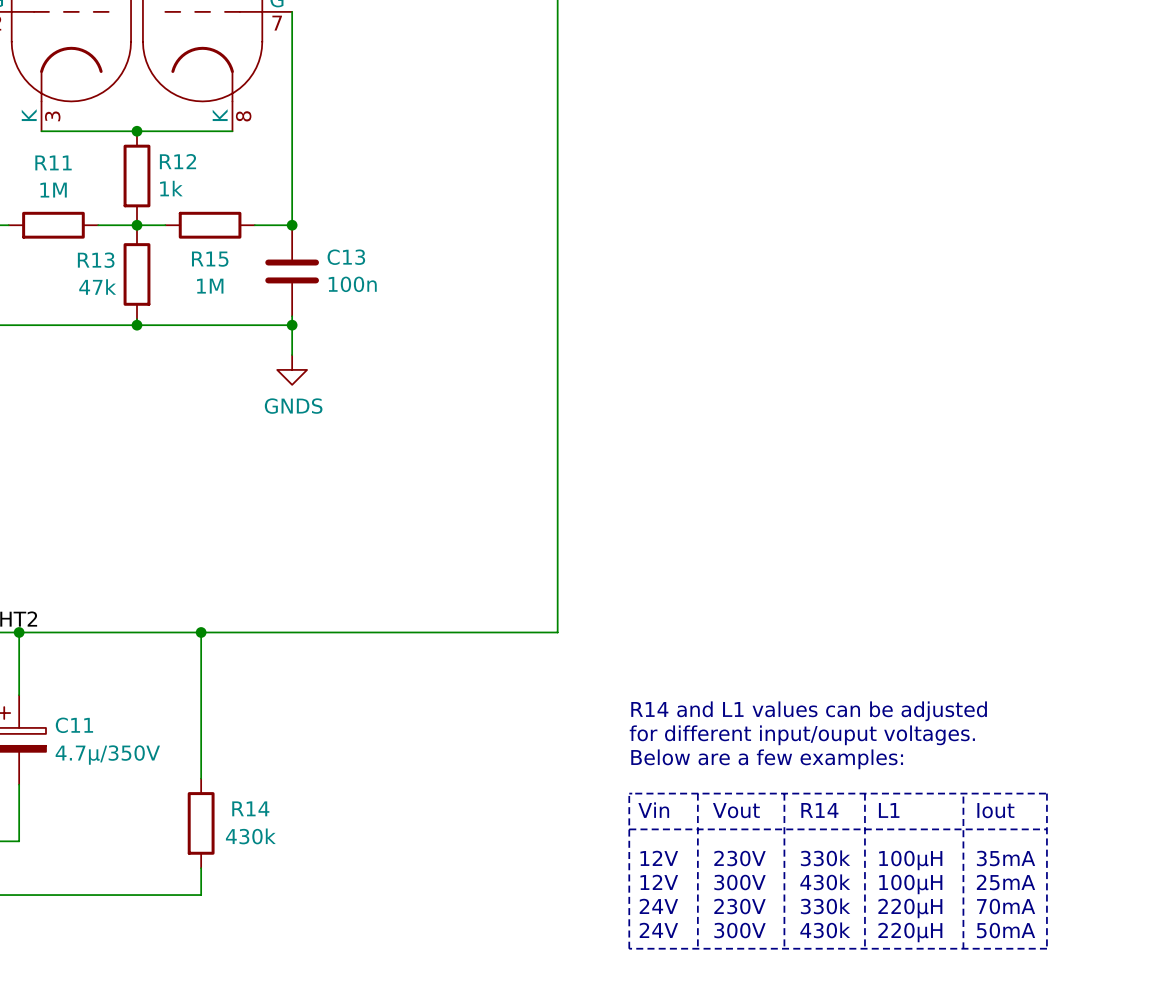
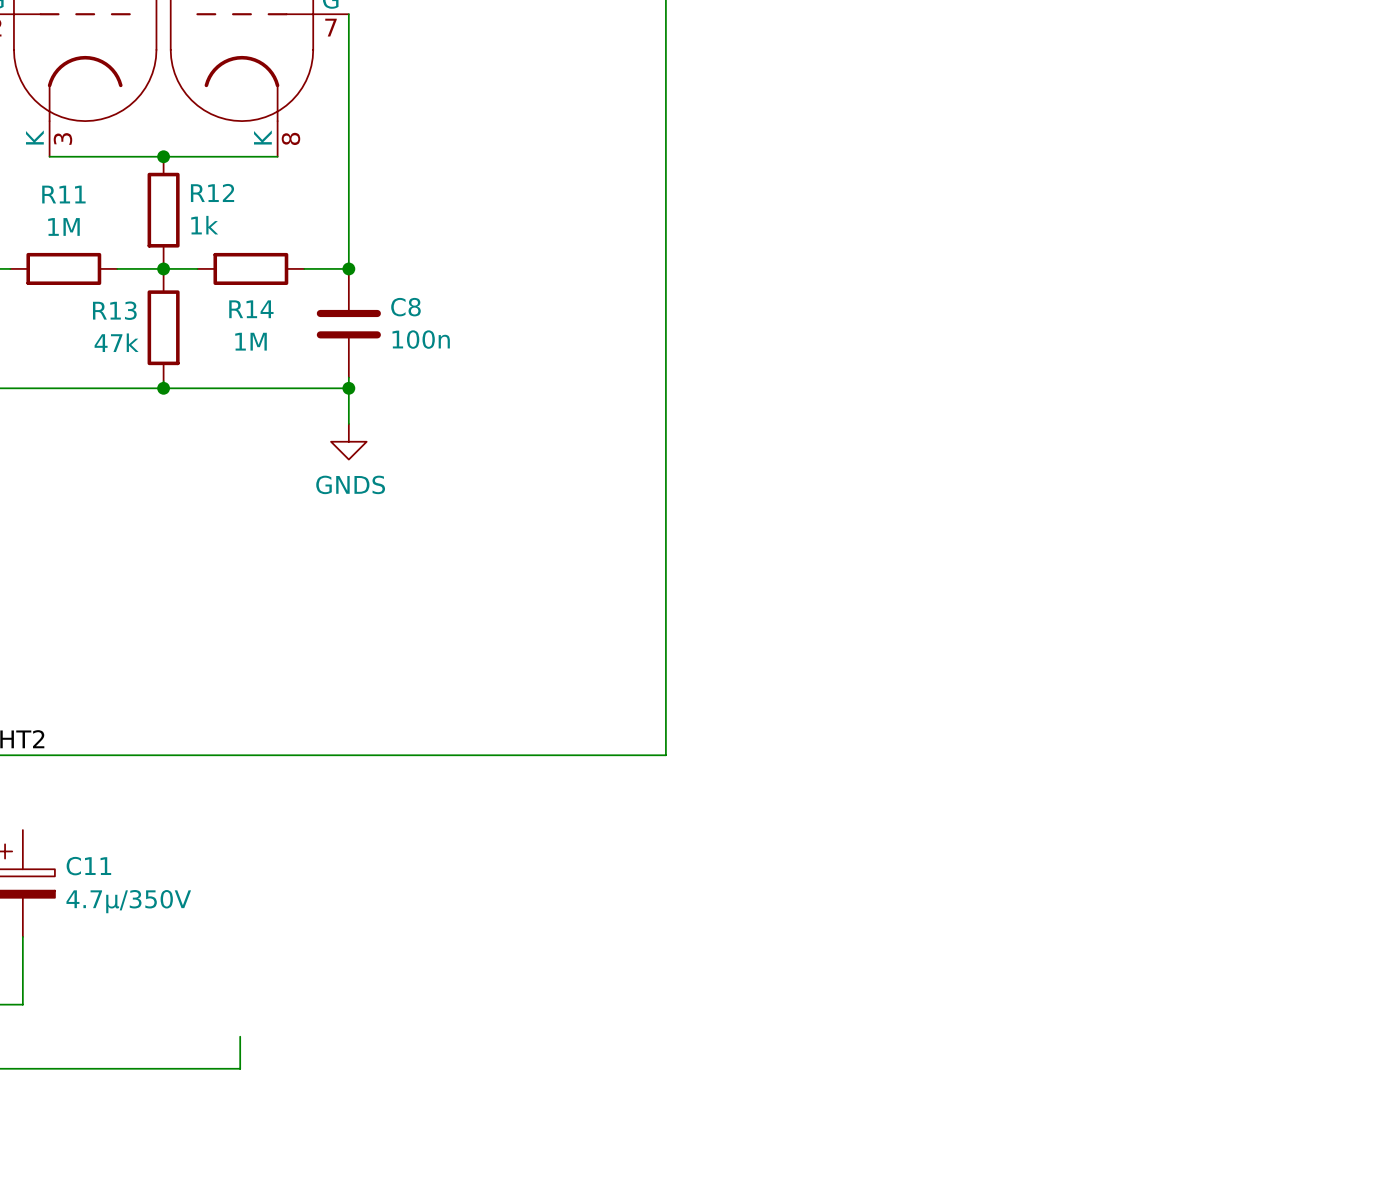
C13 name: C13 (346, 257) -> C8 (405, 307)
R15 name: R15 (210, 259) -> R14 (251, 309)
wire: (19, 632) (19, 695) -> none
junction: (19, 632) -> none
wire: (201, 632) (201, 778) -> none
junction: (201, 632) -> none
text: R14 and L1 values can be adjusted (809, 711) -> none
text: for different input/ouput voltages. (802, 735) -> none
text: Below are a few examples: (767, 759) -> none
line: (632, 793) (629, 793) (629, 948) (1046, 948) (1046, 793) (635, 793) -> none
line: (697, 793) (697, 948) -> none
line: (784, 793) (784, 948) -> none
line: (864, 793) (864, 948) -> none
line: (963, 796) (963, 948) -> none
text: Vin (653, 810) -> none
text: Vout (736, 810) -> none
text: R14 (819, 810) -> none
text: L1 (889, 810) -> none
text: Iout (995, 810) -> none
R14: 430k (201, 823) -> none
line: (629, 829) (1046, 829) -> none
text: 12V (659, 858) -> none
text: 230V (740, 858) -> none
text: 330k (825, 858) -> none
text: 35mA (1006, 858) -> none
text: 100µH (910, 860) -> none
text: 12V (659, 882) -> none
text: 300V (740, 882) -> none
text: 430k (825, 882) -> none
text: 25mA (1006, 882) -> none
text: 100µH (910, 884) -> none
text: 24V (658, 906) -> none
text: 230V (740, 906) -> none
text: 330k (825, 906) -> none
text: 70mA (1006, 906) -> none
text: 220µH (910, 908) -> none
text: 24V (658, 930) -> none
text: 300V (740, 930) -> none
text: 430k (825, 930) -> none
text: 50mA (1006, 930) -> none
text: 220µH (910, 932) -> none

